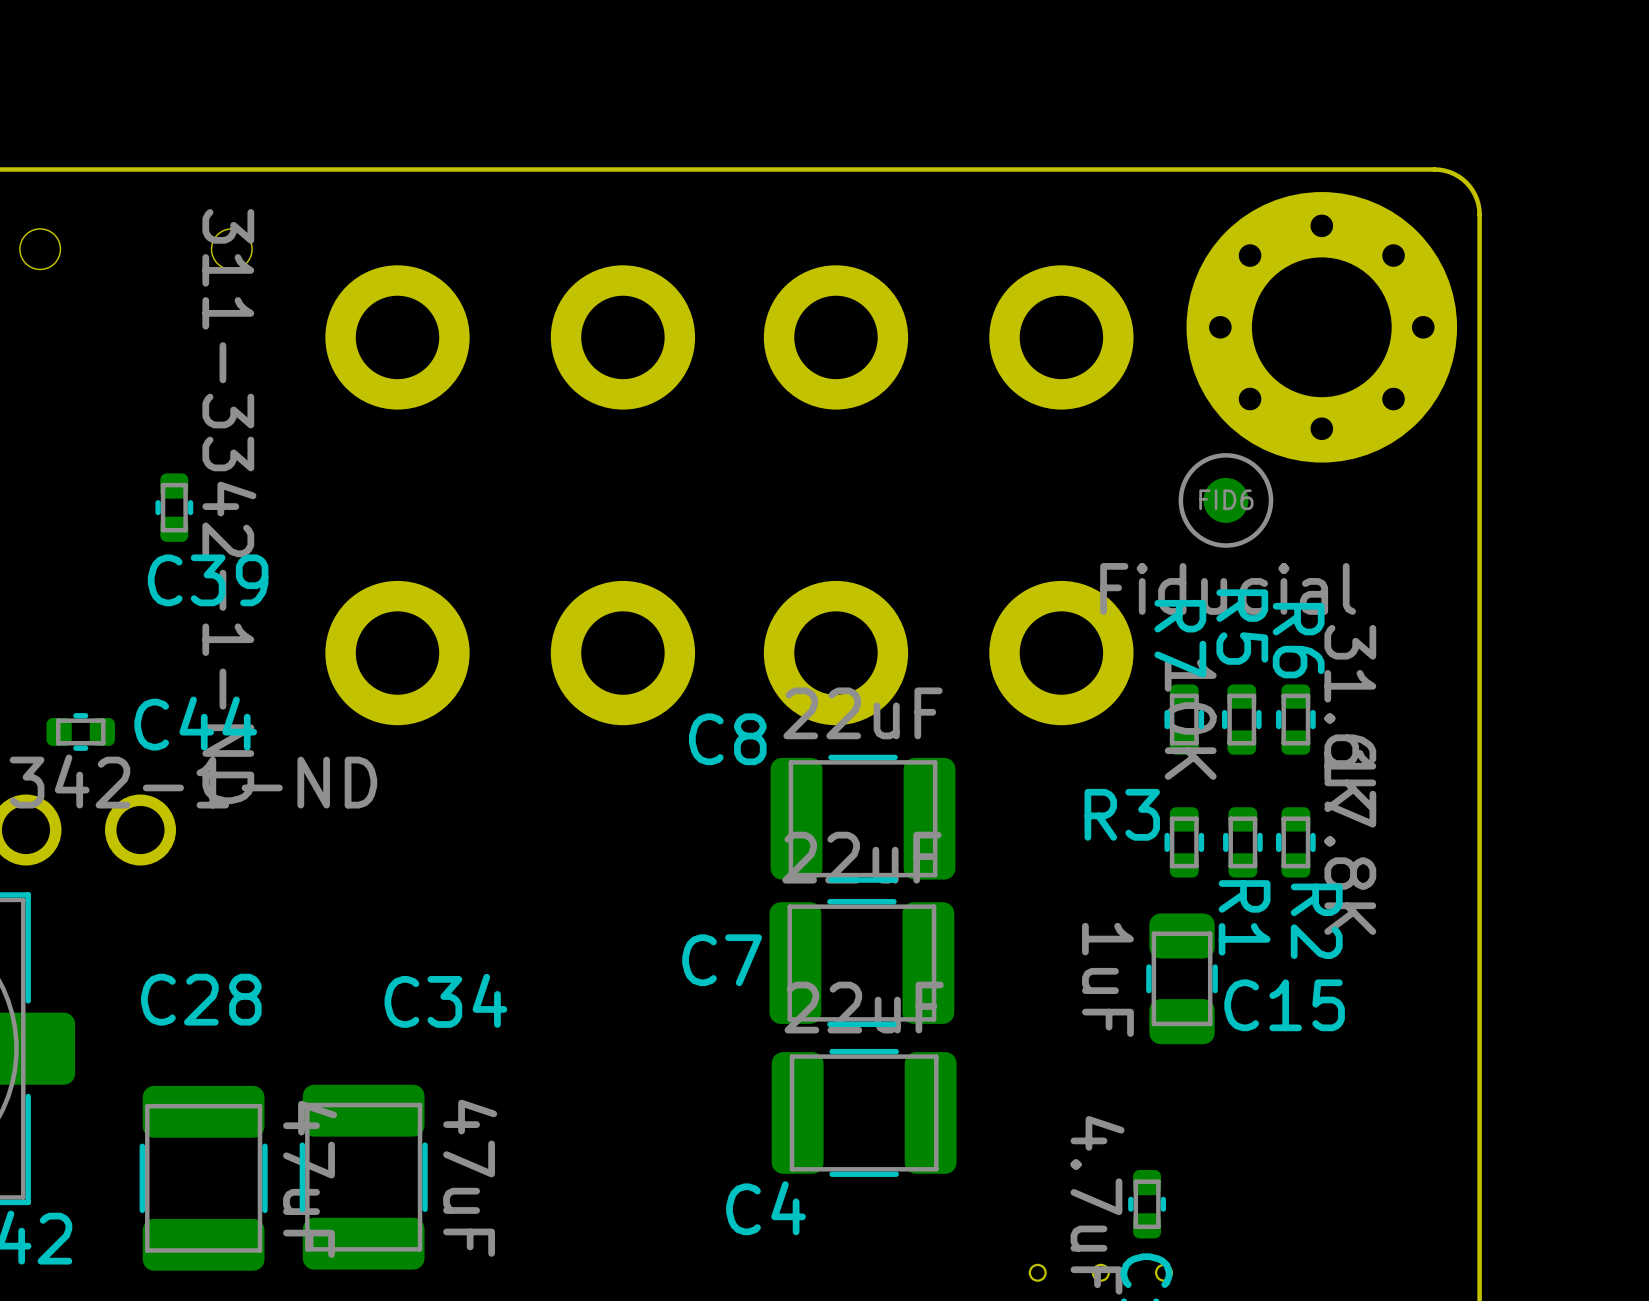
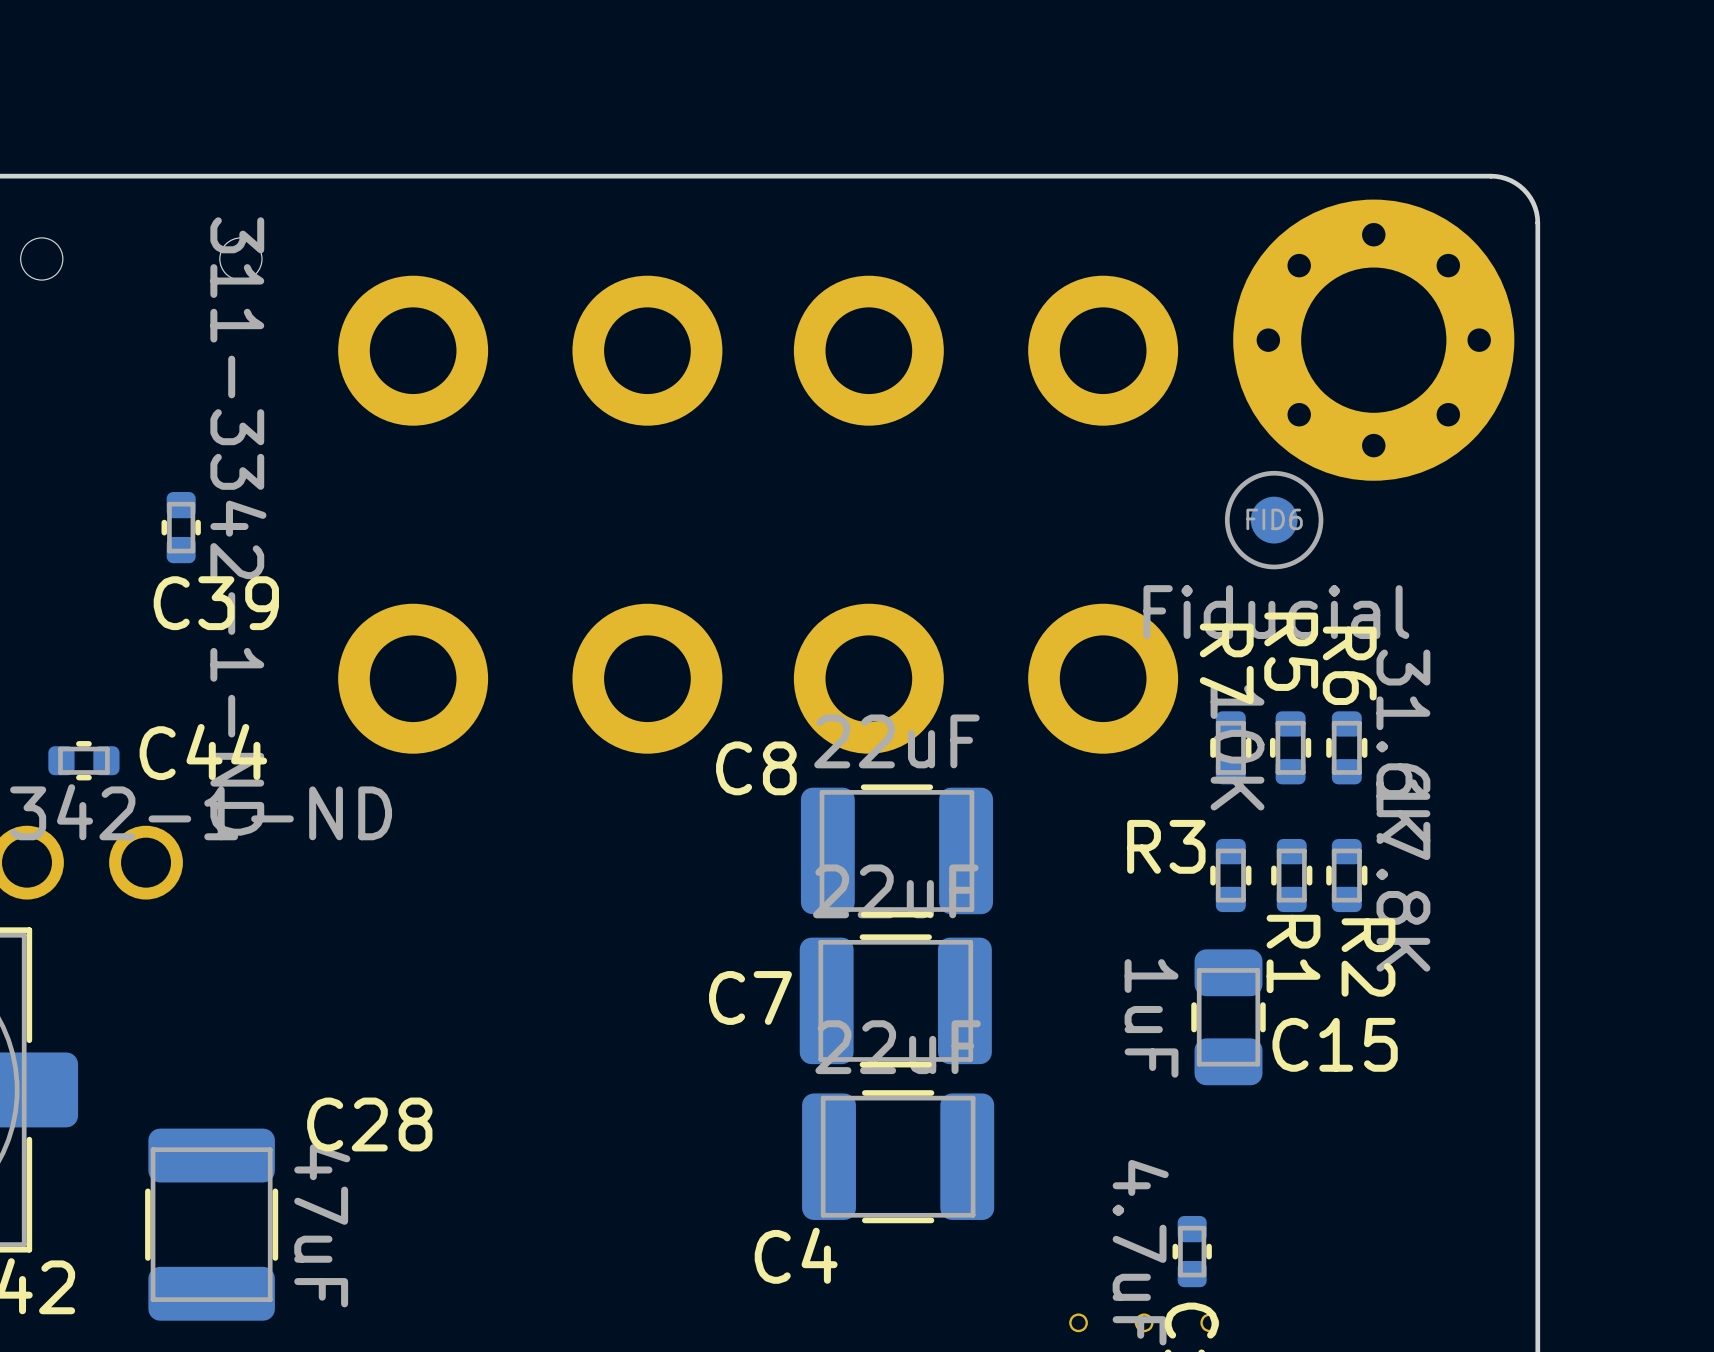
C28 name position: C28 (201, 999) -> C28 (369, 1124)
C34: 47uF (363, 1177) -> none

